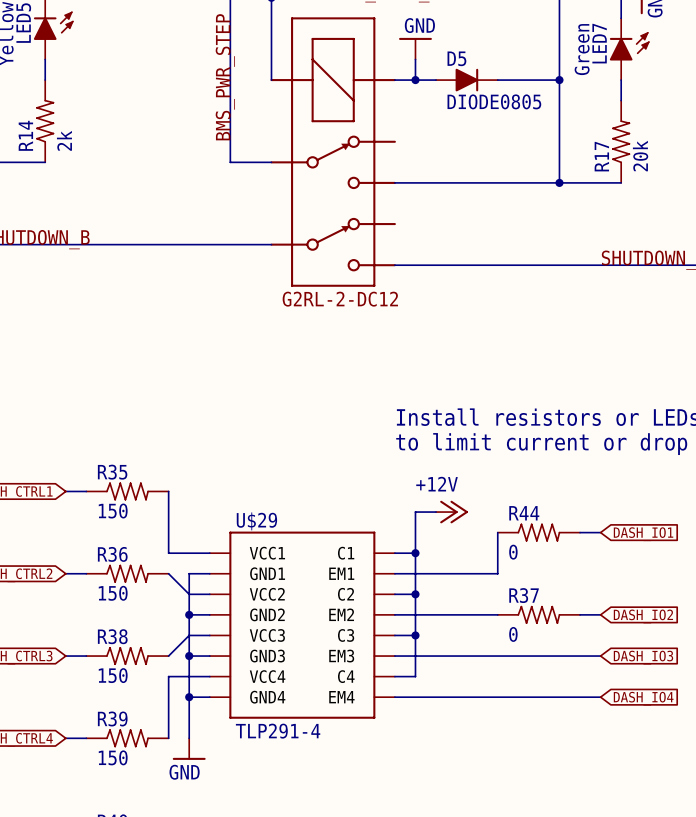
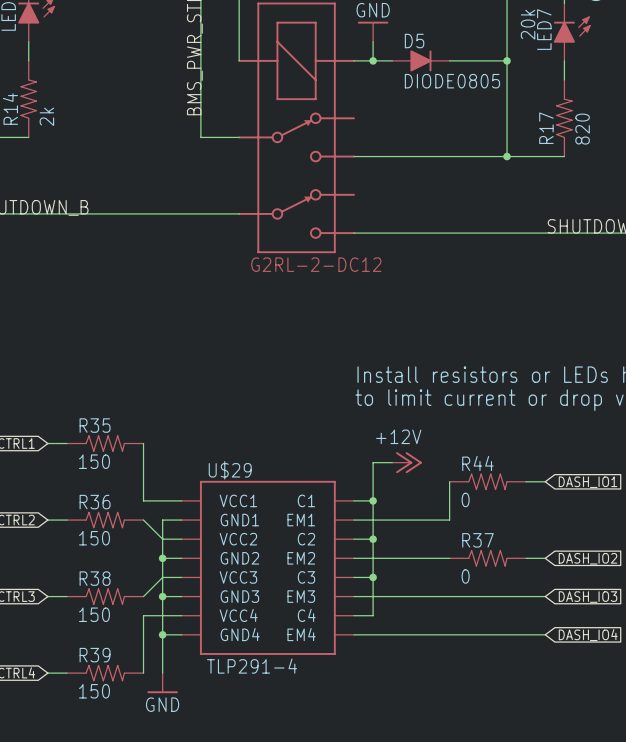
LED7 value: Green (582, 49) -> 20k (528, 24)
R17 value: 20k (640, 156) -> 820 (582, 129)

